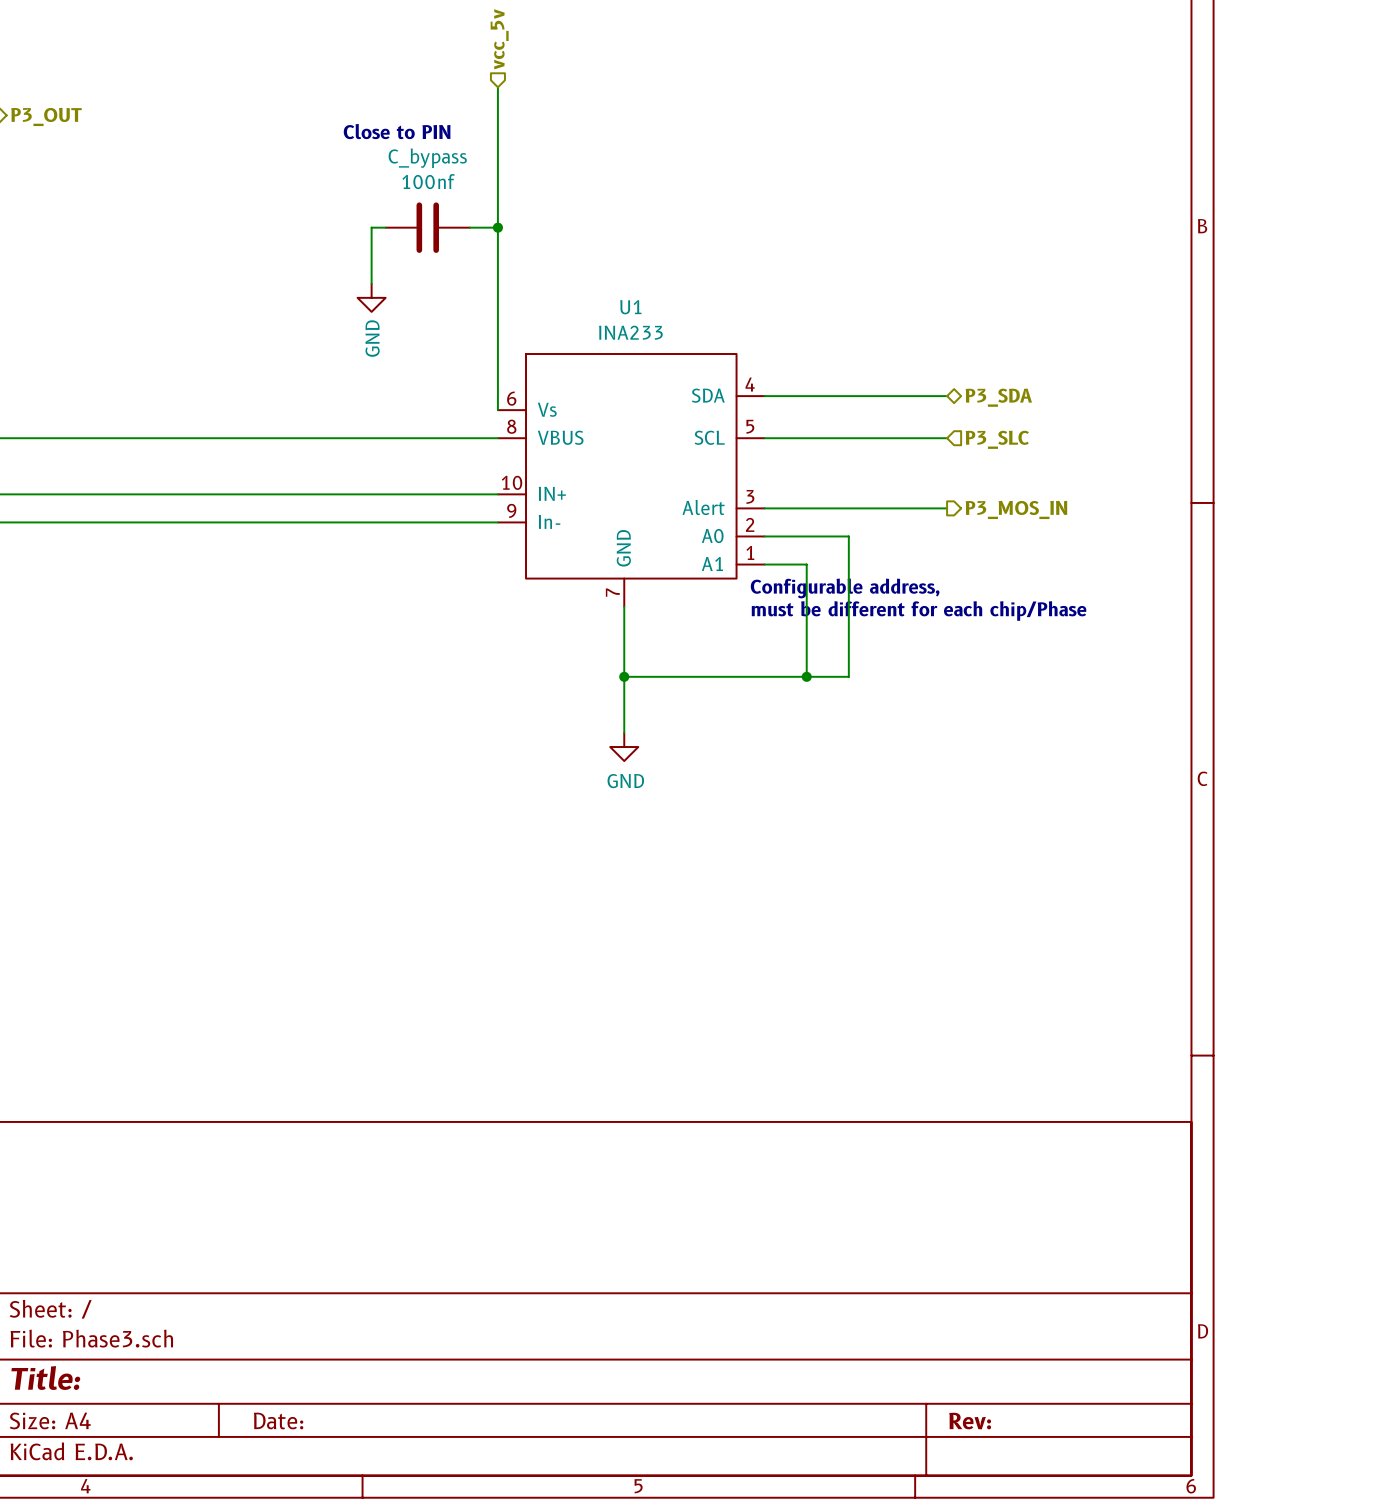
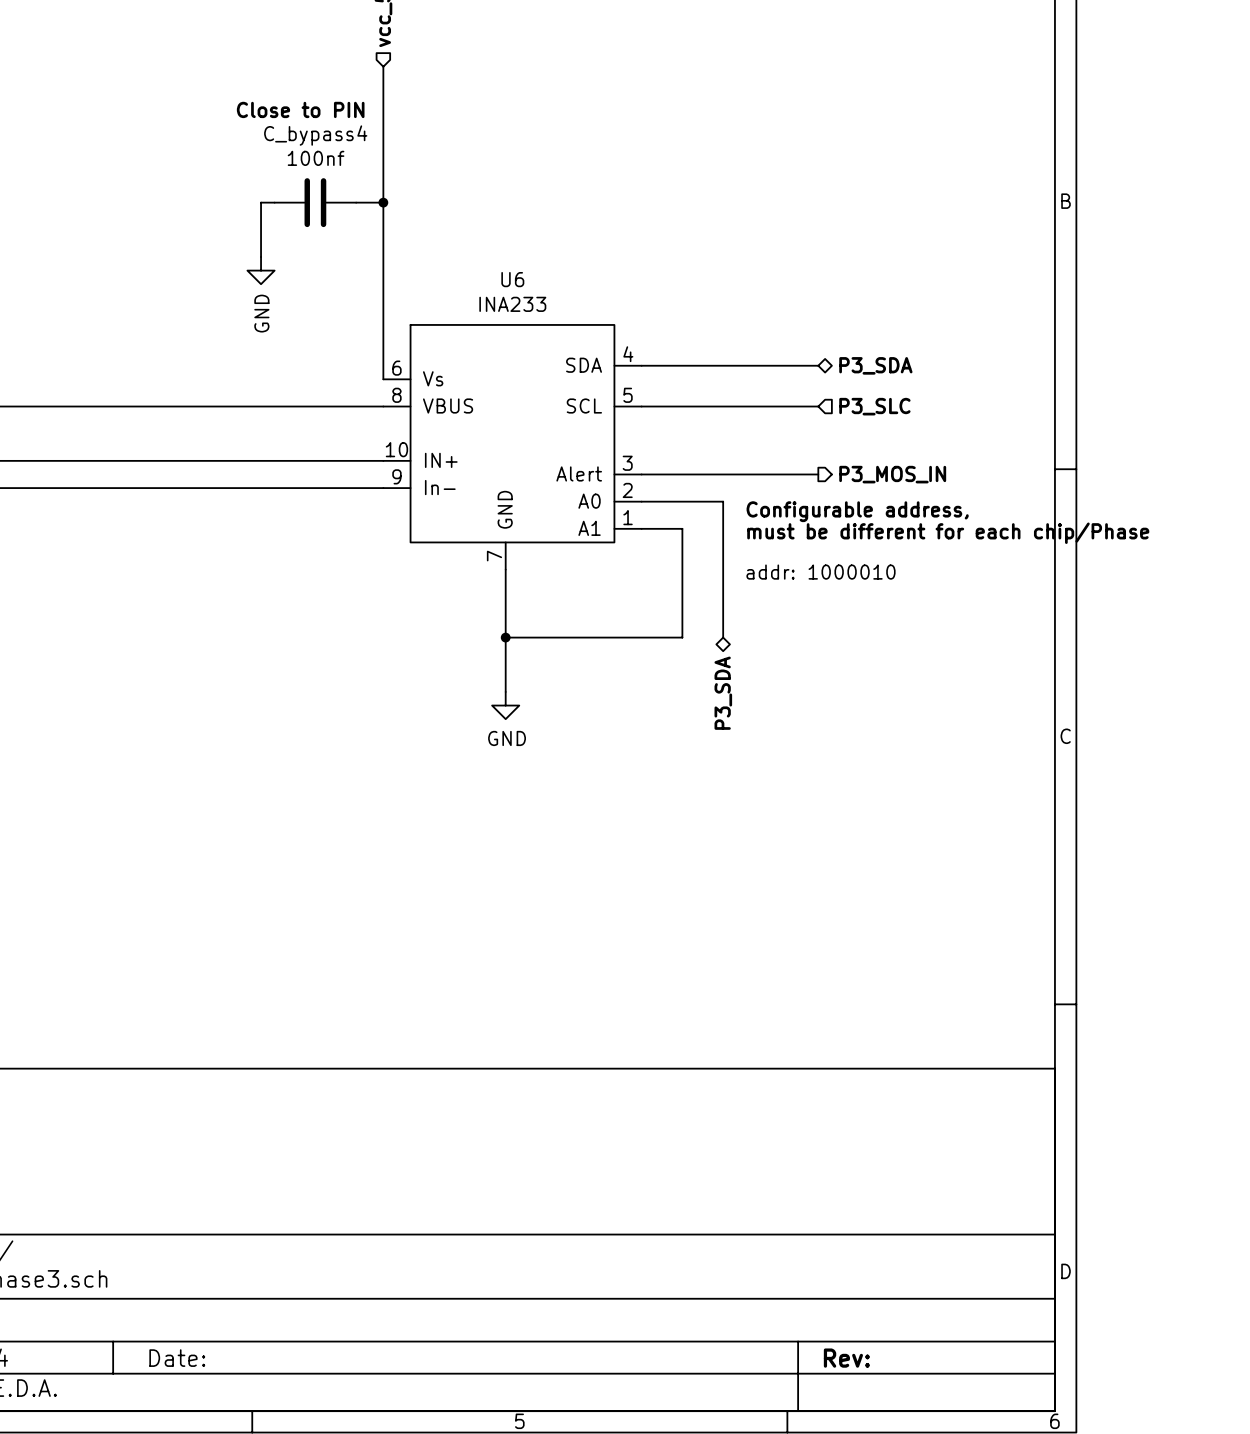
C_bypass name: C_bypass (427, 158) -> C_bypass4 (315, 135)
U1 name: U1 (630, 307) -> U6 (512, 279)
text position: Configurable address, (845, 588) -> Configurable address, (857, 511)
text: none -> addr: 1000010 (821, 572)
text position: must be different for each chip/Phase (919, 611) -> must be different for each chip/Phase (948, 533)
wire: (806, 676) (848, 676) -> none
junction: (806, 676) -> none
hierarchical label: none -> P3_SDA (723, 693)

